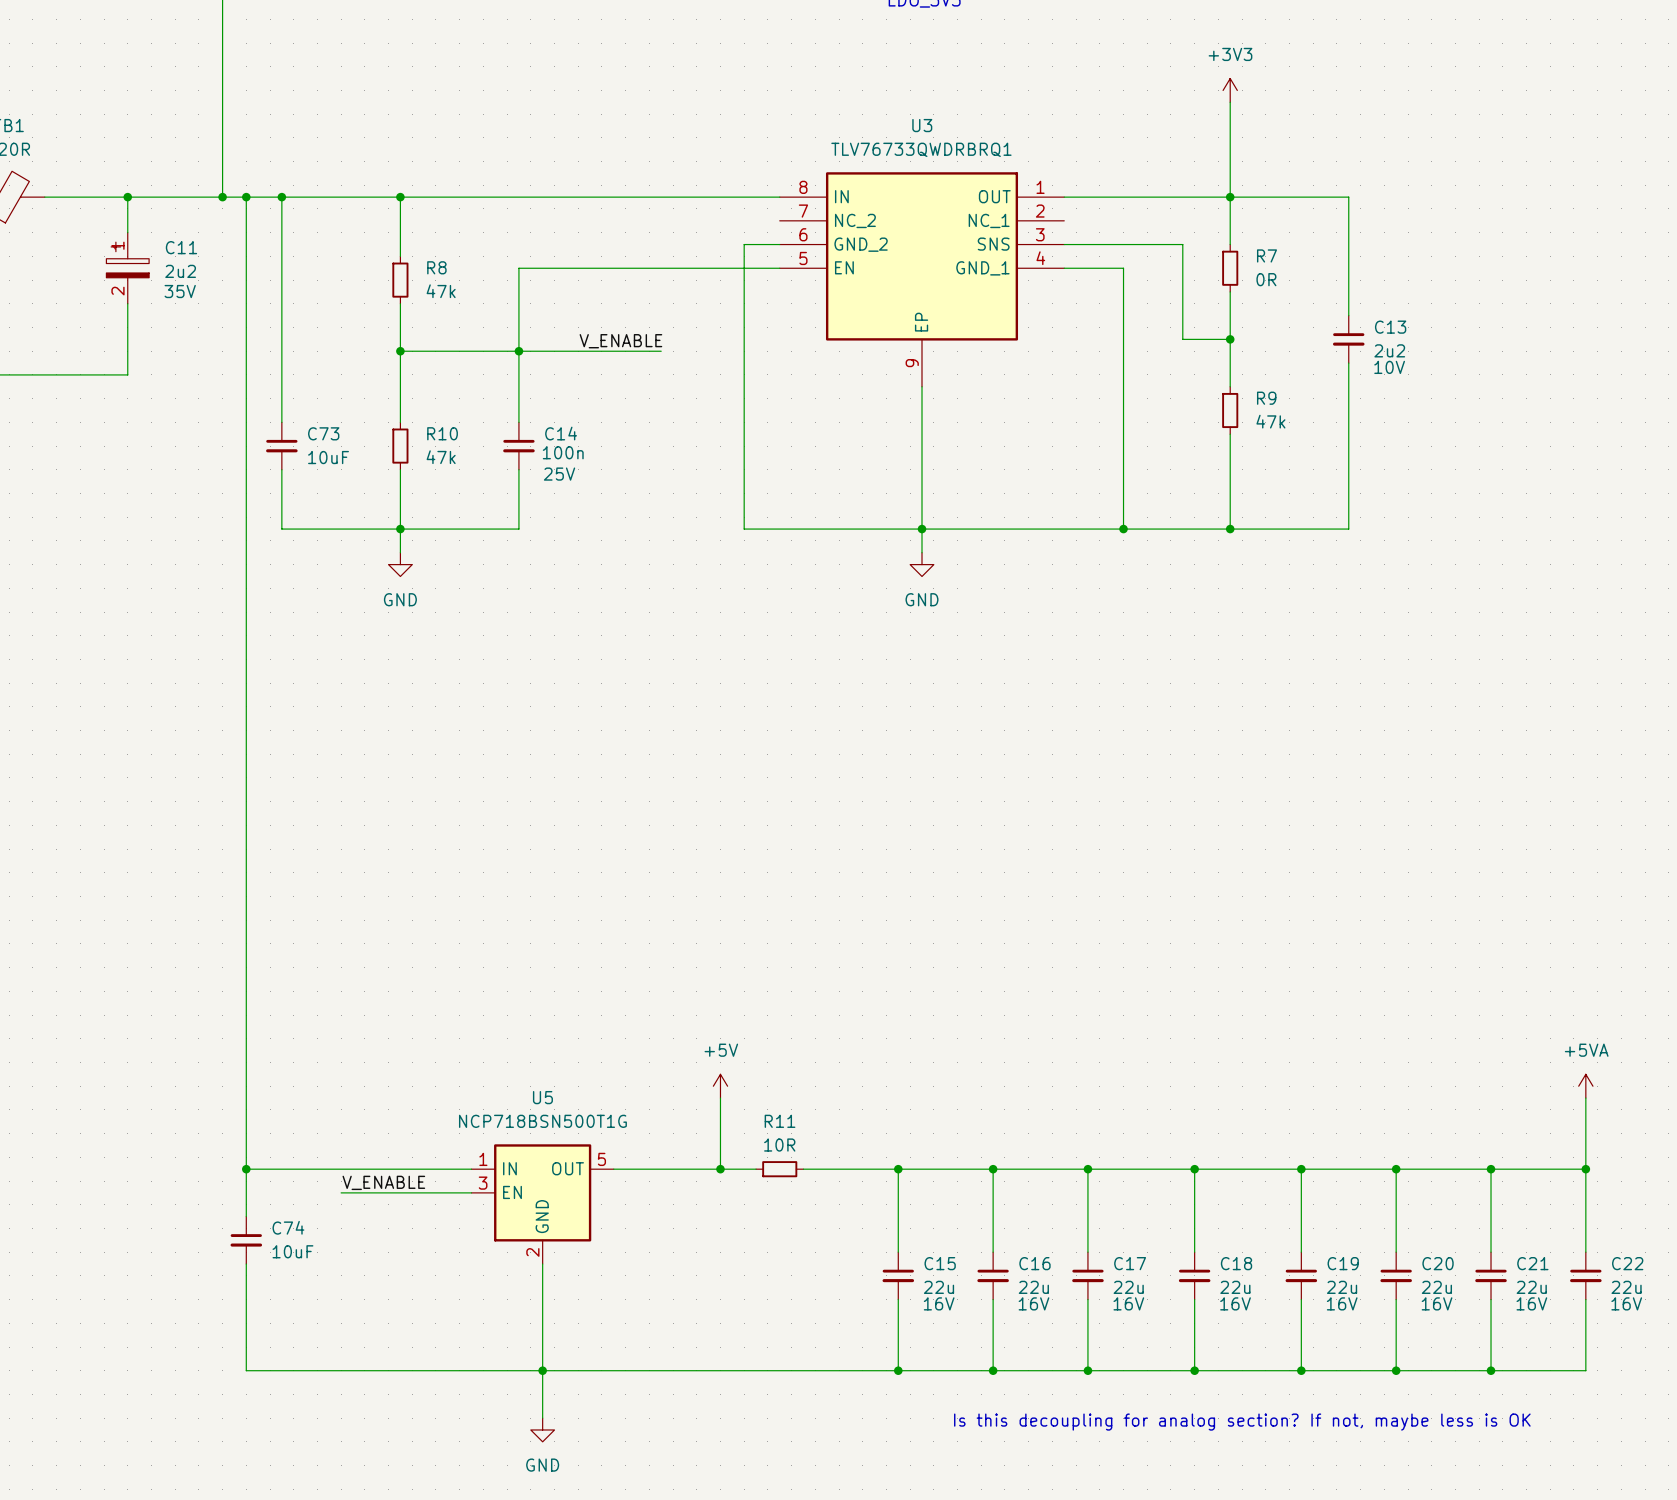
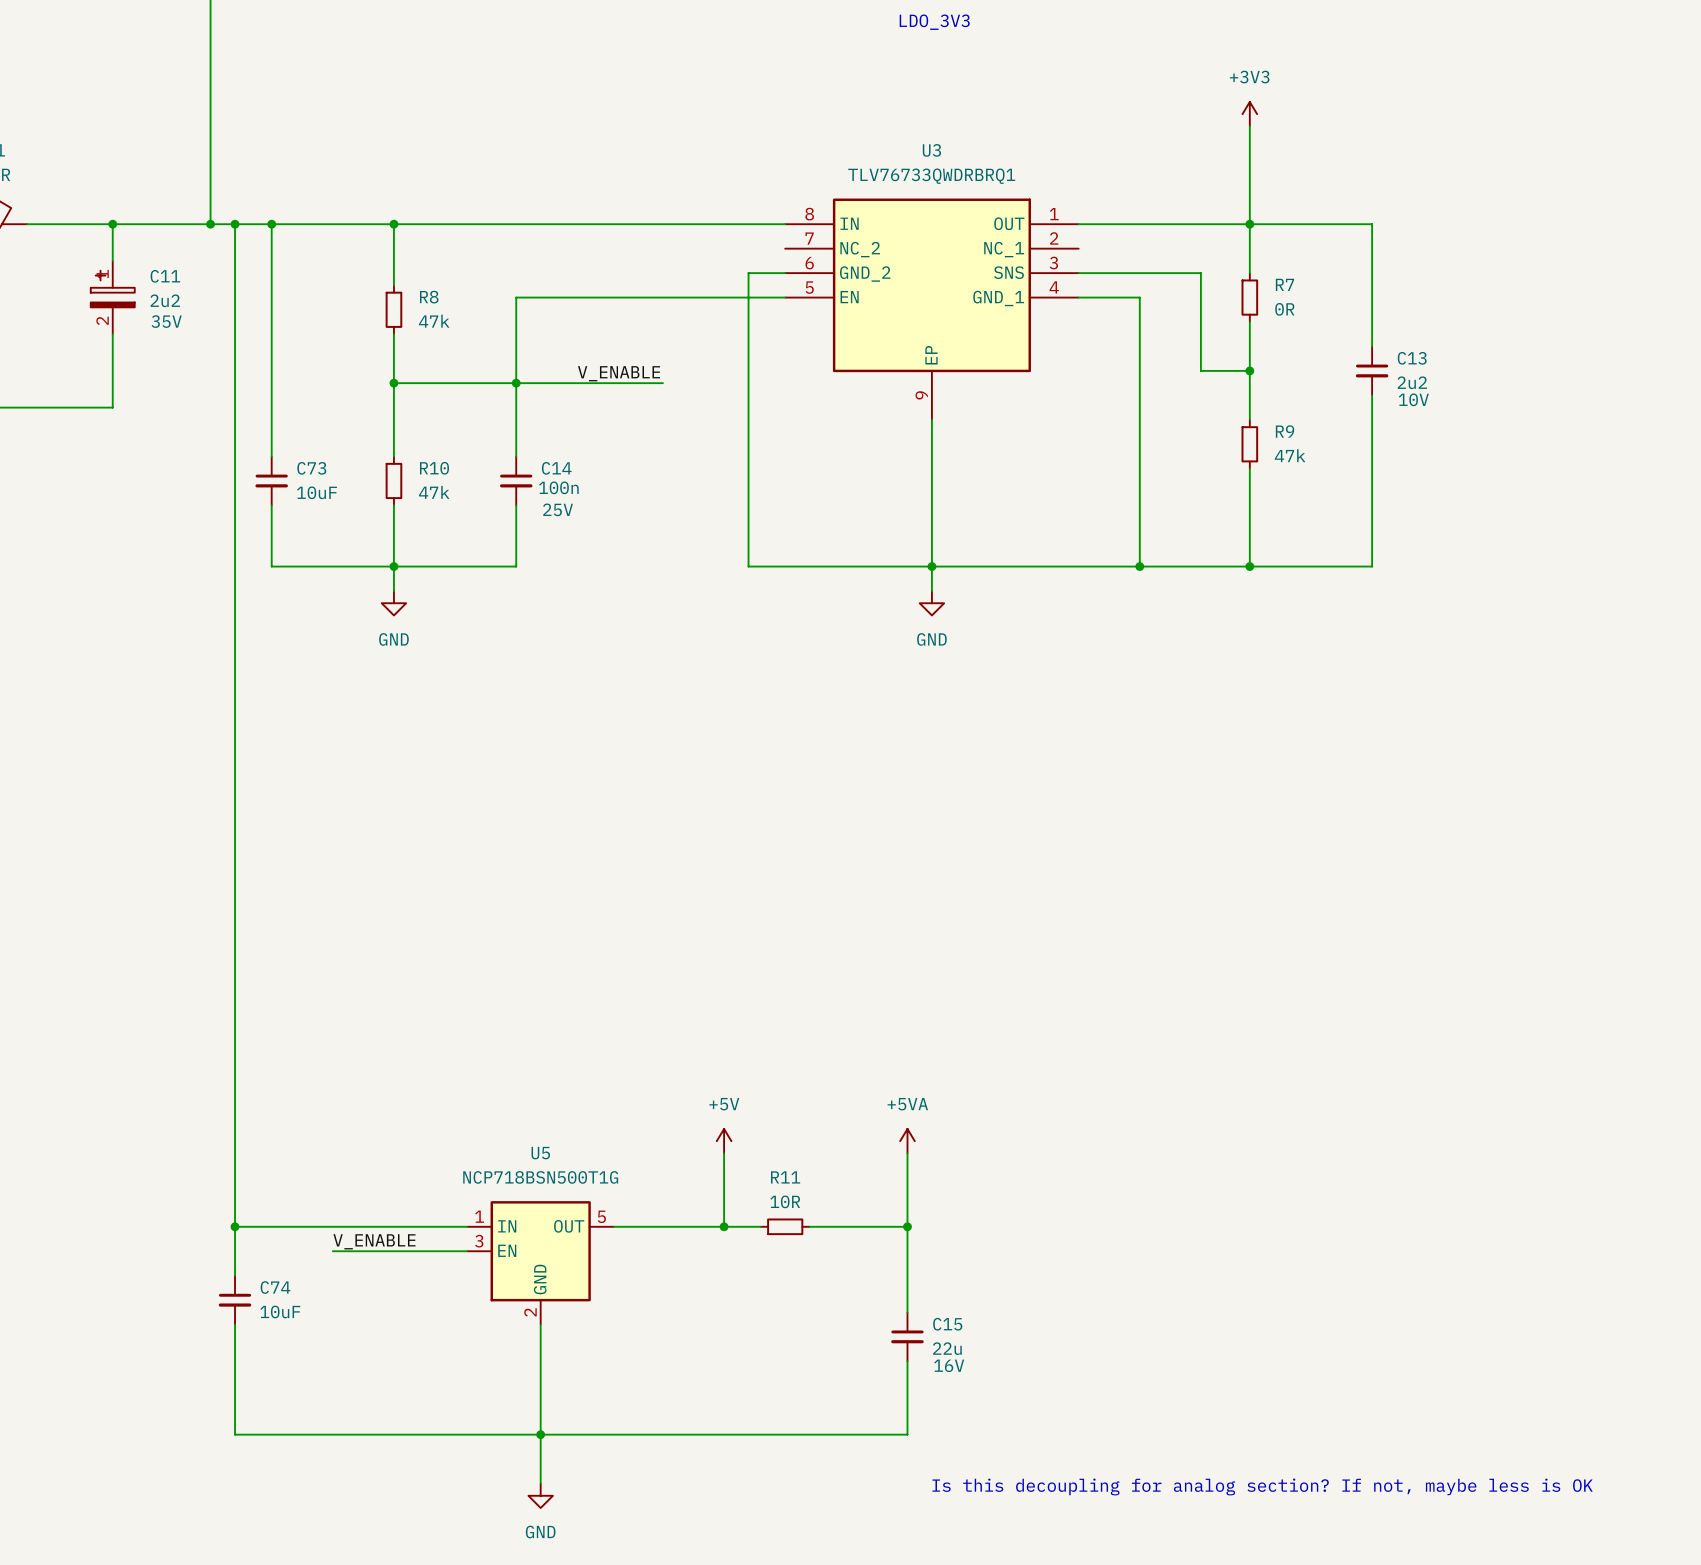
power symbol: none -> +5VA (907, 1141)
power symbol: +5VA (1585, 1086) -> none
wire: (1585, 1098) (1585, 1252) -> none
wire: (898, 1169) (1585, 1169) -> (907, 1226) (907, 1153)
wire: (993, 1169) (993, 1252) -> none
junction: (993, 1169) -> none
wire: (1087, 1169) (1087, 1252) -> none
junction: (1087, 1169) -> none
wire: (1194, 1169) (1194, 1252) -> none
junction: (1194, 1169) -> none
wire: (1301, 1169) (1301, 1252) -> none
junction: (1301, 1169) -> none
wire: (1396, 1169) (1396, 1252) -> none
junction: (1396, 1169) -> none
wire: (1491, 1169) (1491, 1252) -> none
junction: (1491, 1169) -> none
junction: (1585, 1169) -> none
C16: 22u (993, 1275) -> none
C17: 22u (1087, 1275) -> none
C18: 22u (1194, 1275) -> none
C19: 22u (1301, 1275) -> none
C20: 22u (1396, 1275) -> none
C21: 22u (1491, 1275) -> none
C22: 22u (1585, 1275) -> none
wire: (993, 1299) (993, 1370) -> none
wire: (1087, 1299) (1087, 1370) -> none
wire: (1194, 1299) (1194, 1370) -> none
wire: (1301, 1299) (1301, 1370) -> none
wire: (1396, 1299) (1396, 1370) -> none
wire: (1491, 1299) (1491, 1370) -> none
wire: (1585, 1299) (1585, 1370) (898, 1370) -> none
junction: (898, 1370) -> none
junction: (993, 1370) -> none
junction: (1087, 1370) -> none
junction: (1194, 1370) -> none
junction: (1301, 1370) -> none
junction: (1396, 1370) -> none
junction: (1491, 1370) -> none

